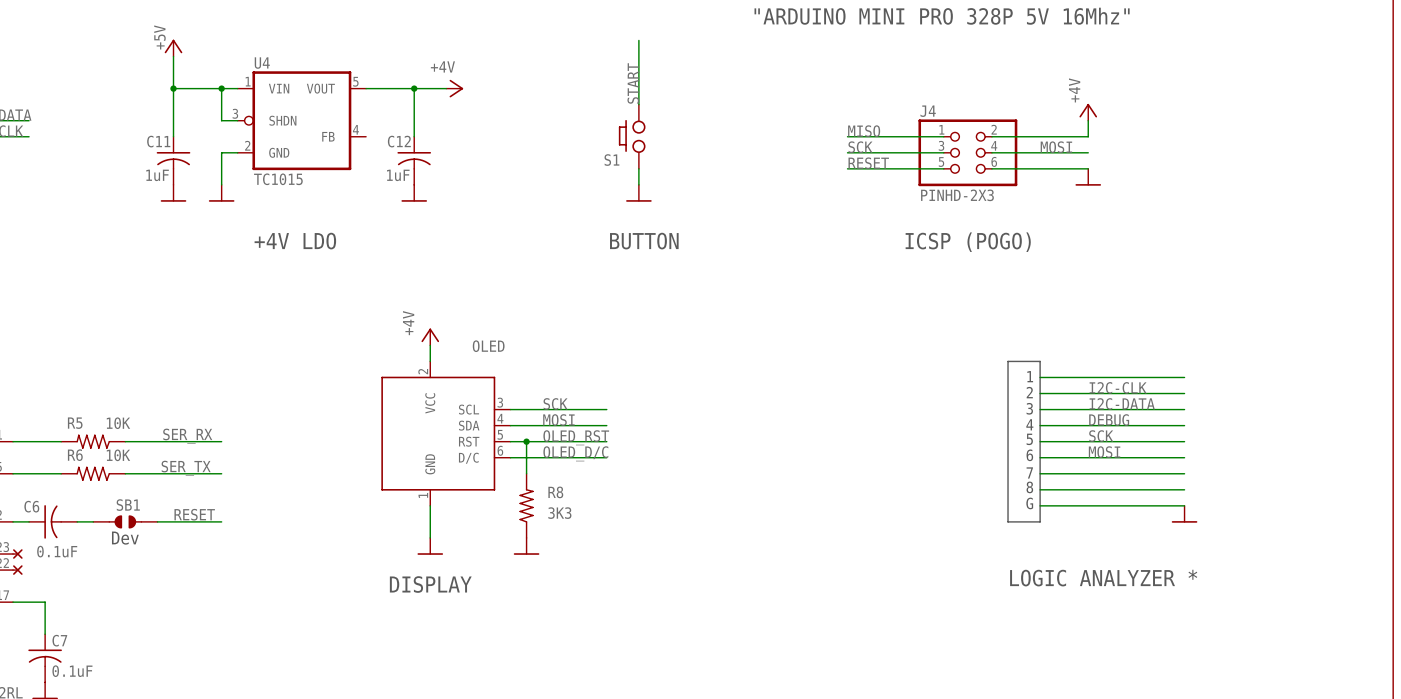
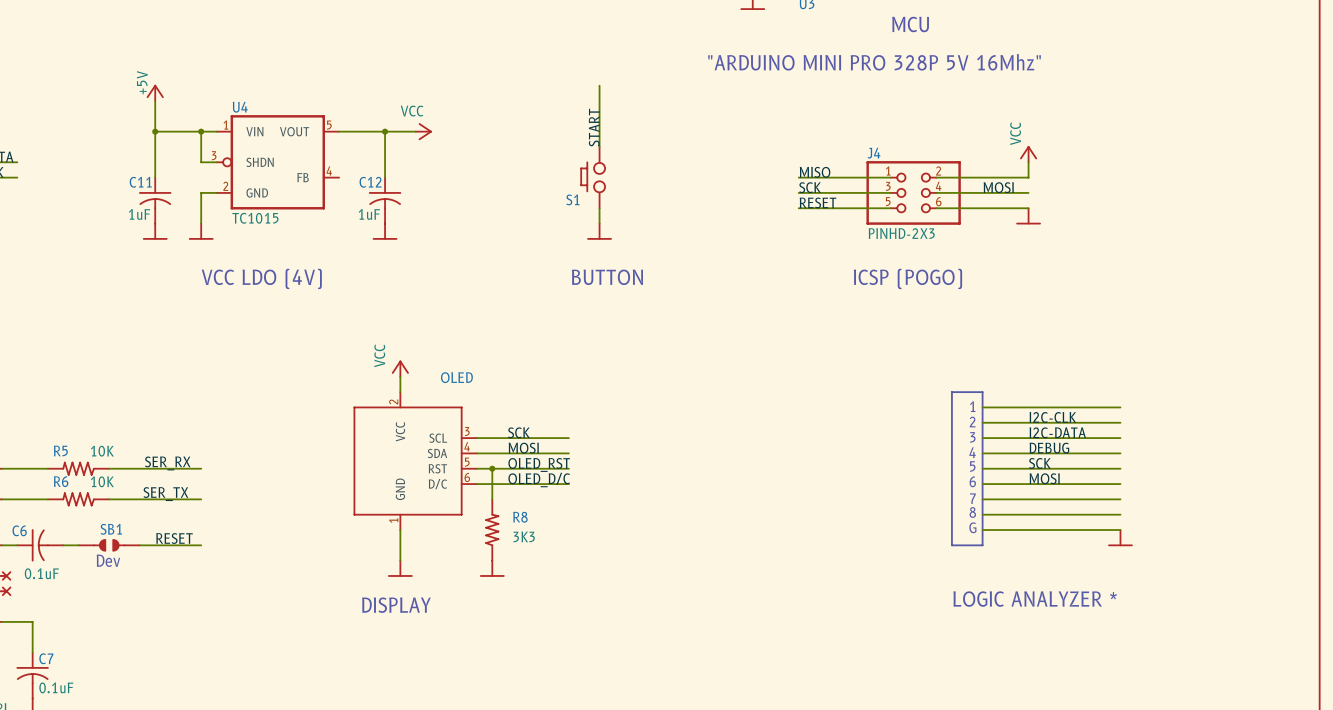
power symbol: +4V (454, 88) -> VCC (423, 131)
power symbol: +4V (1088, 112) -> VCC (1028, 154)
text: +4V LDO (295, 241) -> none
text: none -> VCC LDO (4V) (261, 278)
power symbol: +4V (430, 336) -> VCC (400, 368)

